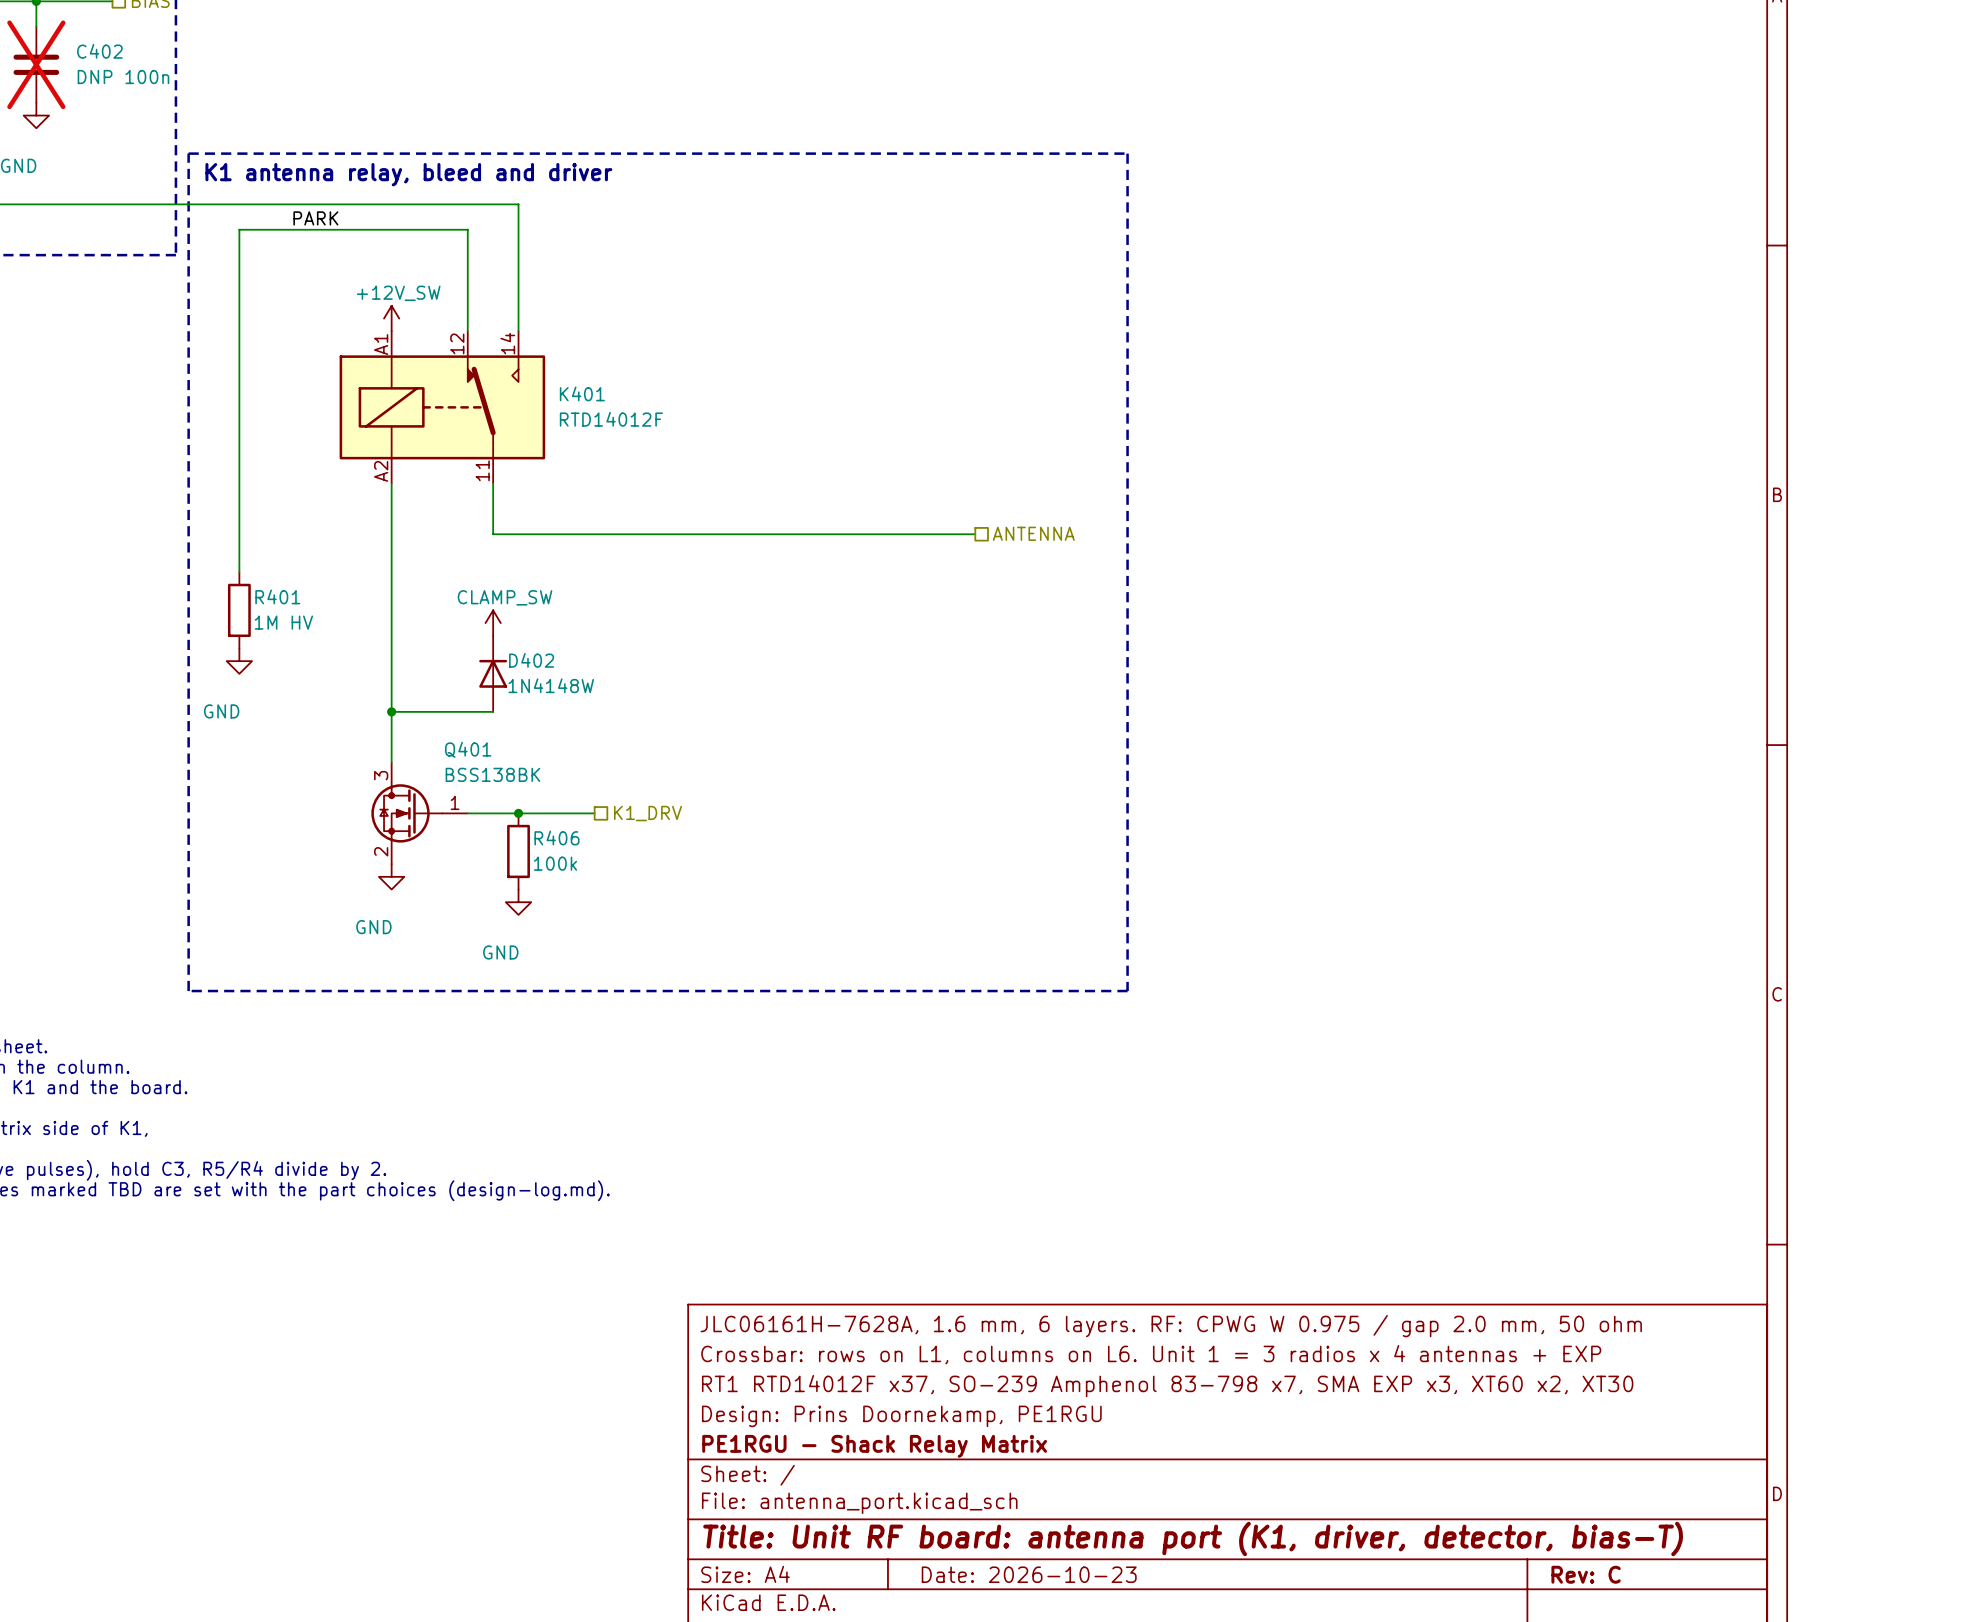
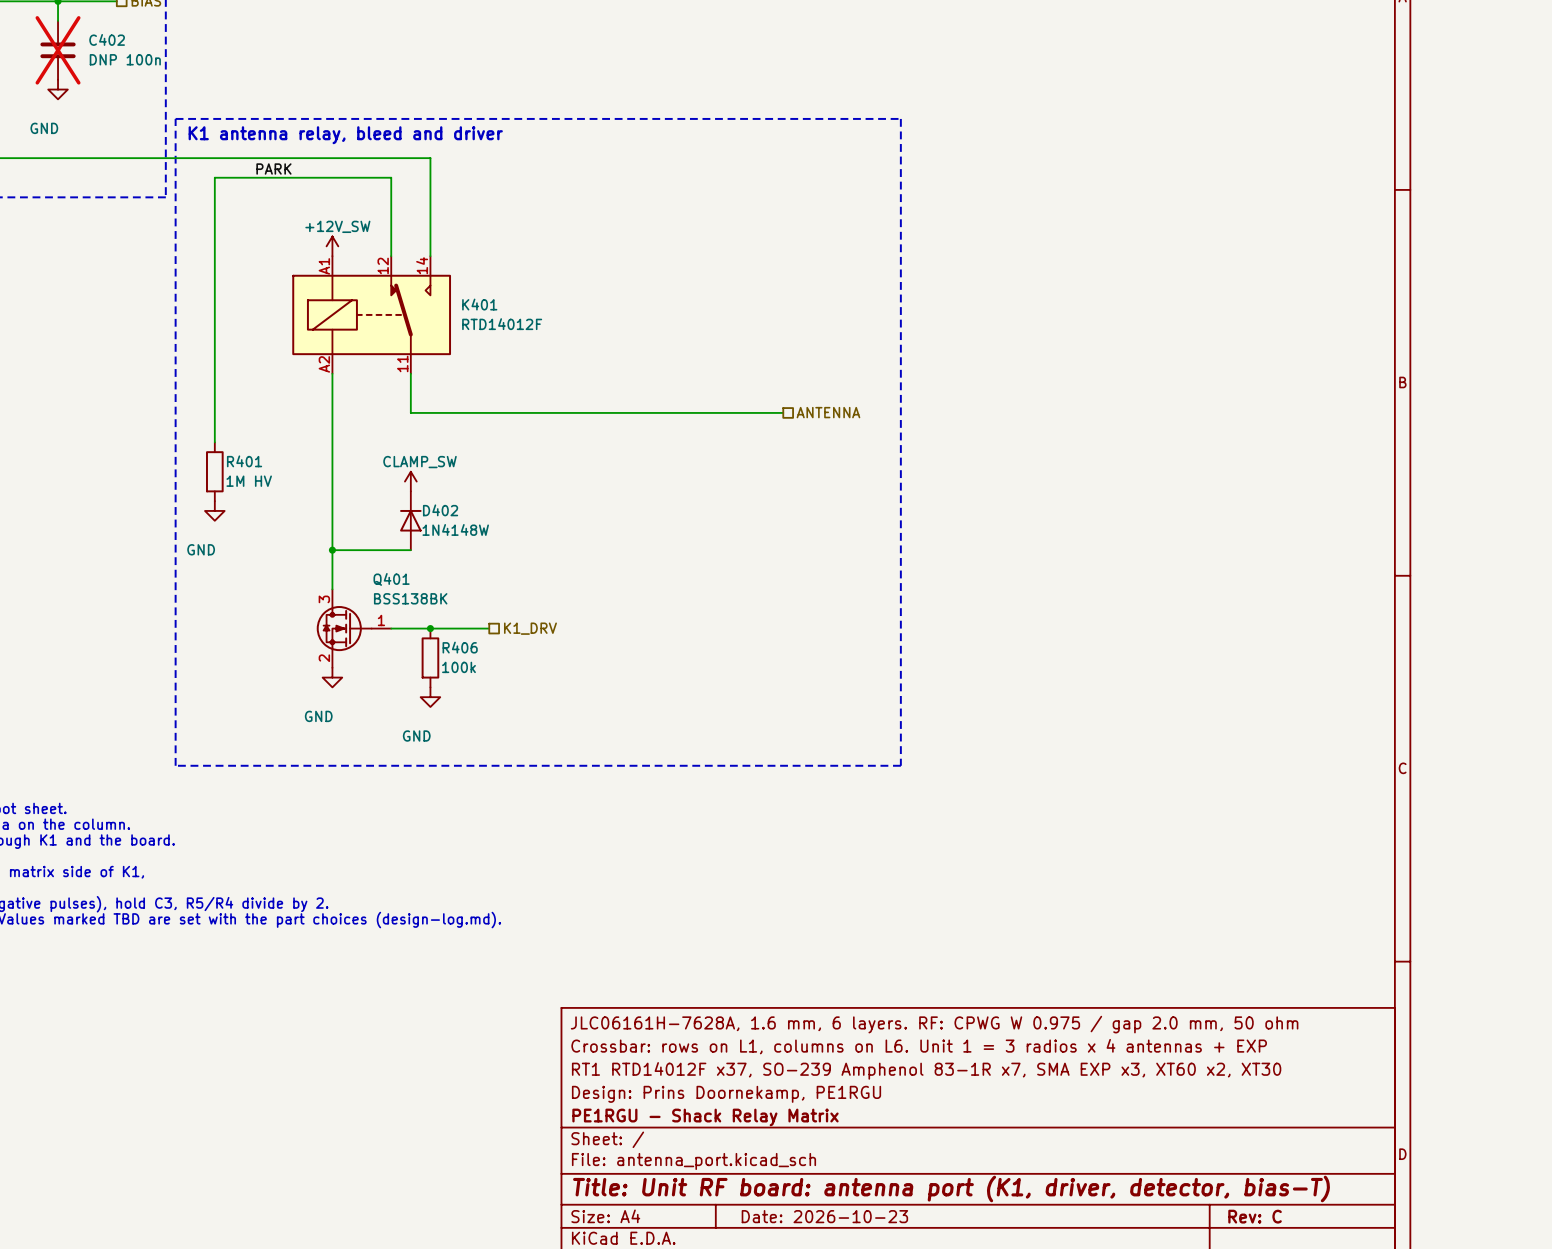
title block: RT1 RTD14012F x37, SO-239 Amphenol 83-798 x7, SMA EXP x3, XT60 x2, XT30 (1167, 1386) -> RT1 RTD14012F x37, SO-239 Amphenol 83-1R x7, SMA EXP x3, XT60 x2, XT30 (926, 1070)

